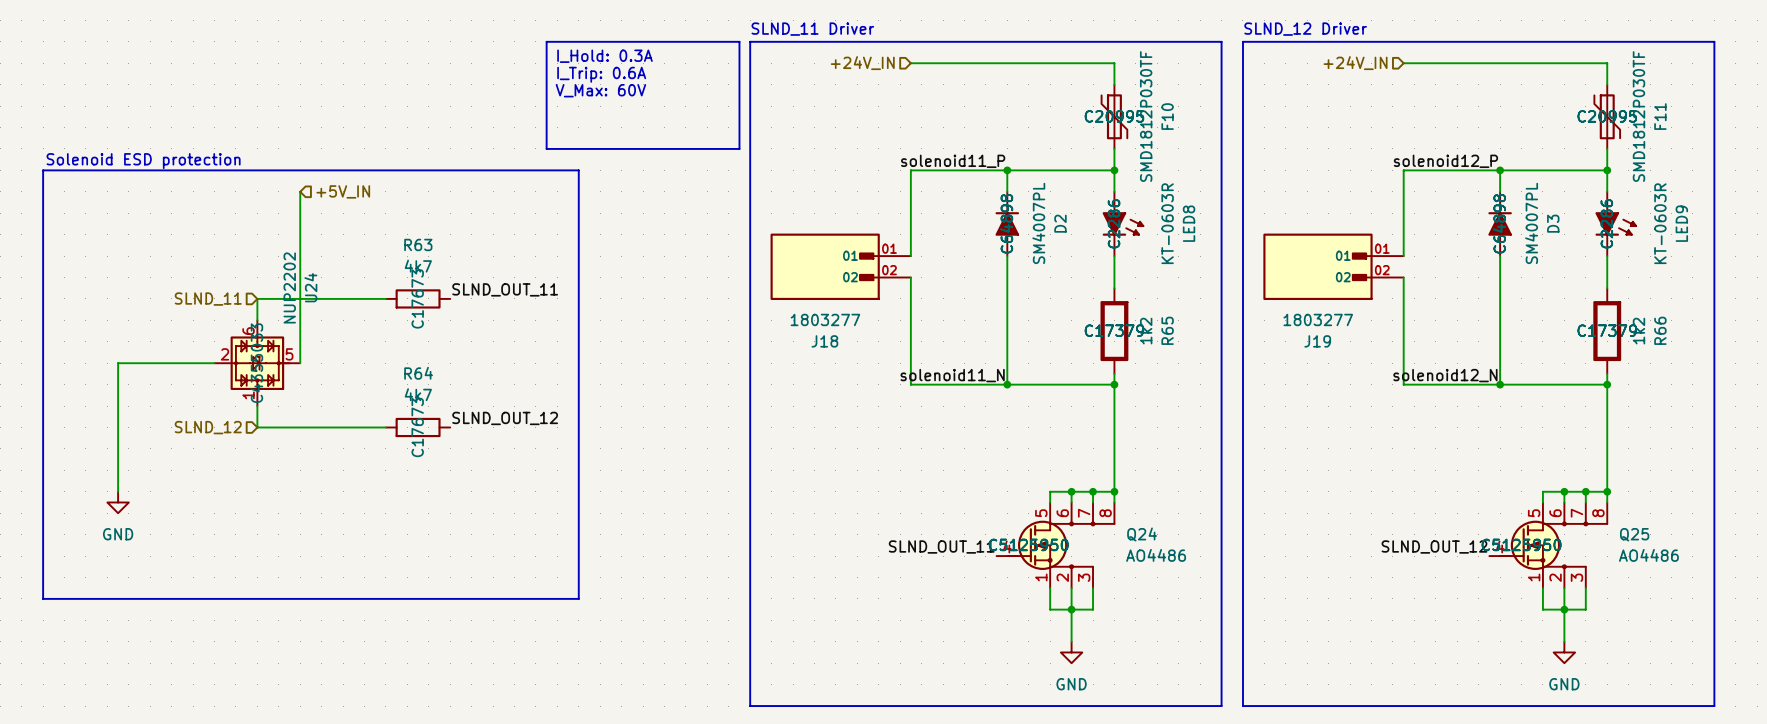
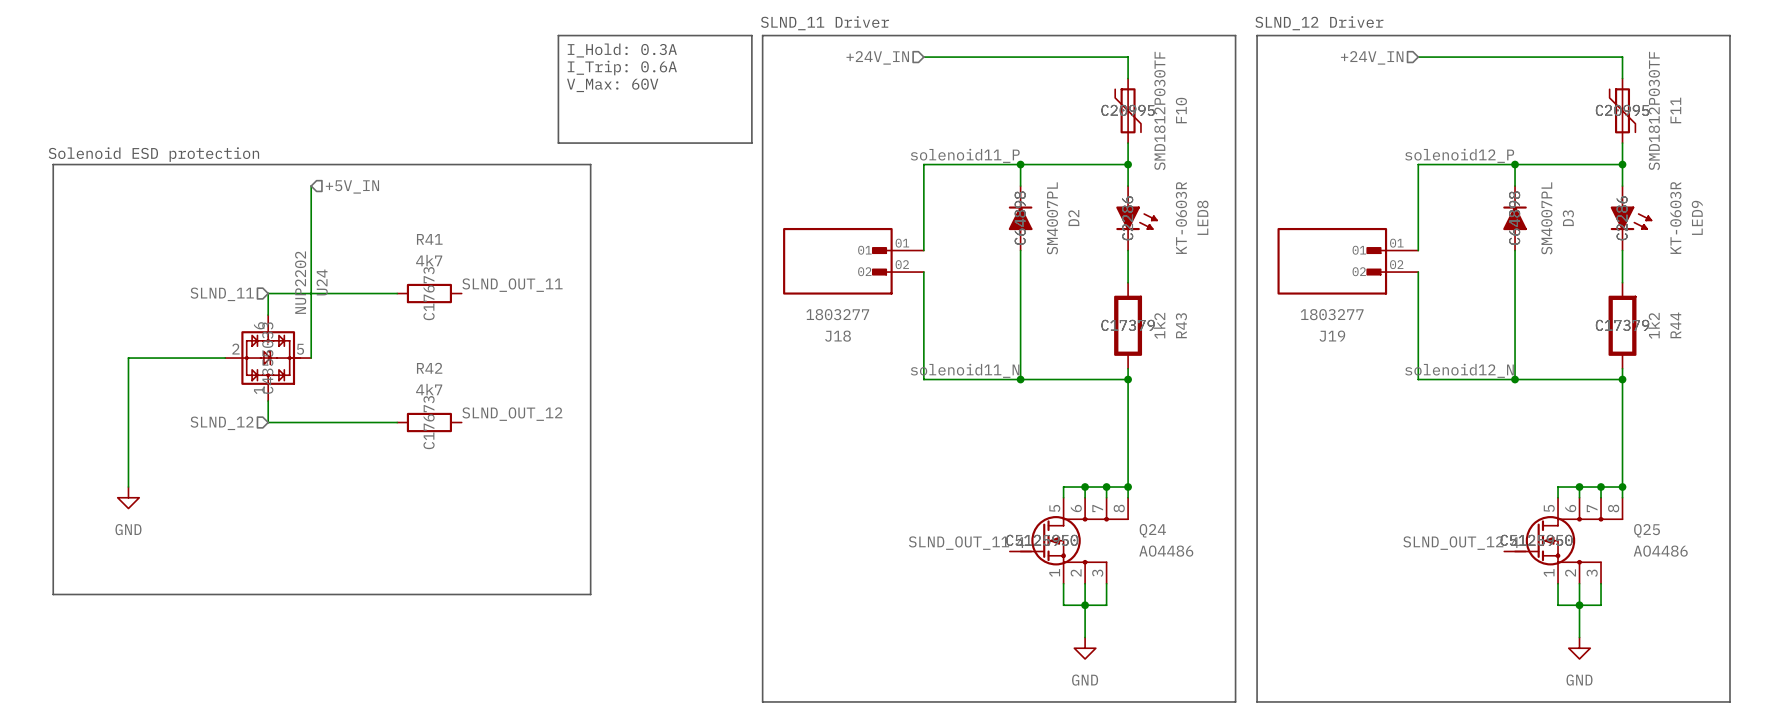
R63 name: R63 (418, 244) -> R41 (429, 239)
R65 name: R65 (1167, 330) -> R43 (1181, 325)
R66 name: R66 (1660, 330) -> R44 (1675, 325)
R64 name: R64 (418, 373) -> R42 (429, 368)

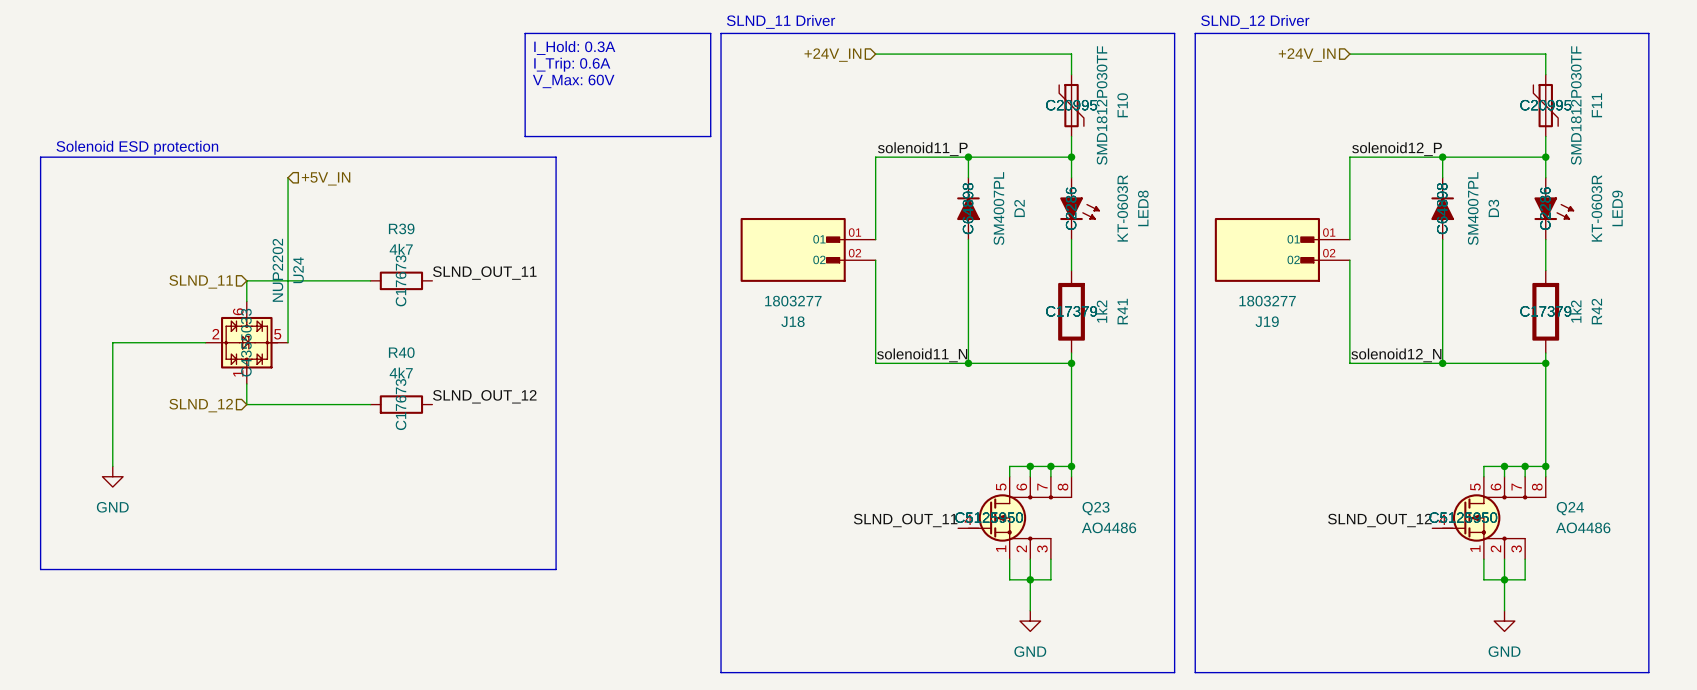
R41 name: R41 (429, 239) -> R39 (401, 228)
R43 name: R43 (1181, 325) -> R41 (1122, 311)
R44 name: R44 (1675, 325) -> R42 (1596, 311)
R42 name: R42 (429, 368) -> R40 (401, 352)
Q24 name: Q24 (1152, 530) -> Q23 (1096, 508)
Q25 name: Q25 (1647, 530) -> Q24 (1570, 508)

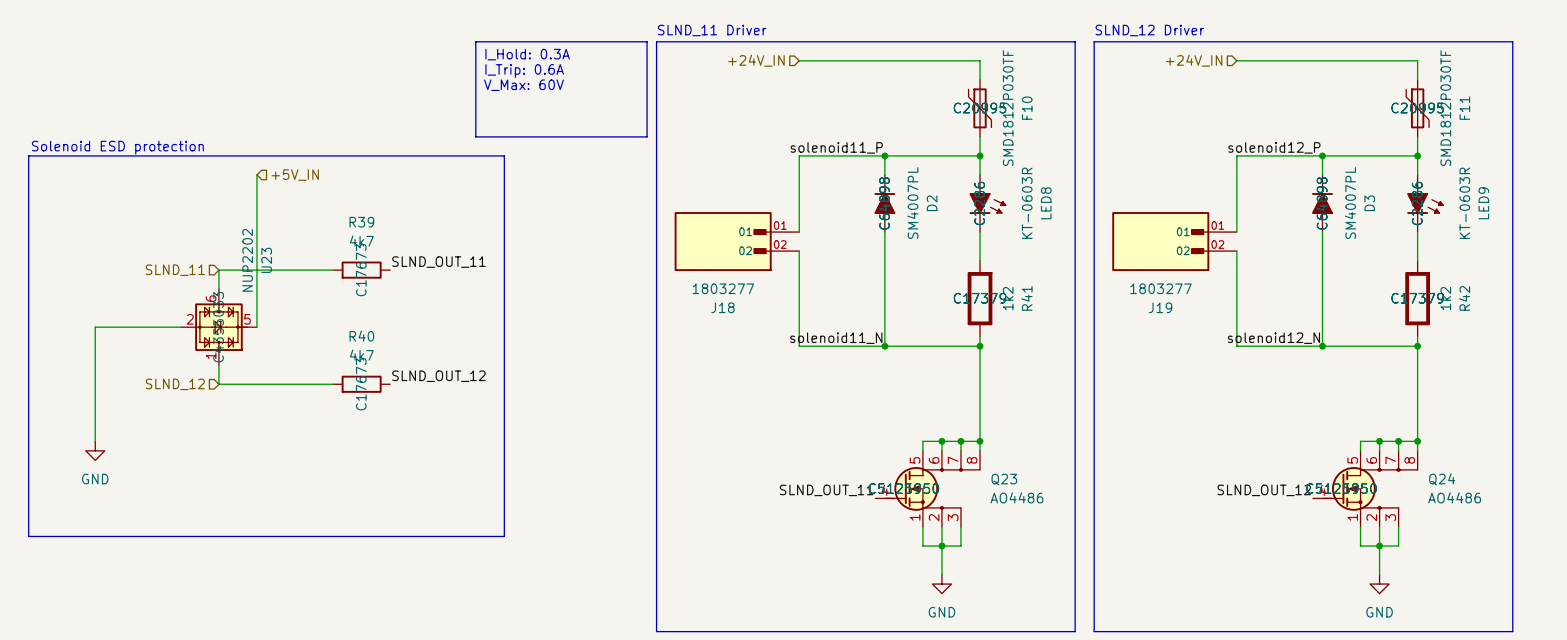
U24 name: U24 (298, 270) -> U23 (266, 260)

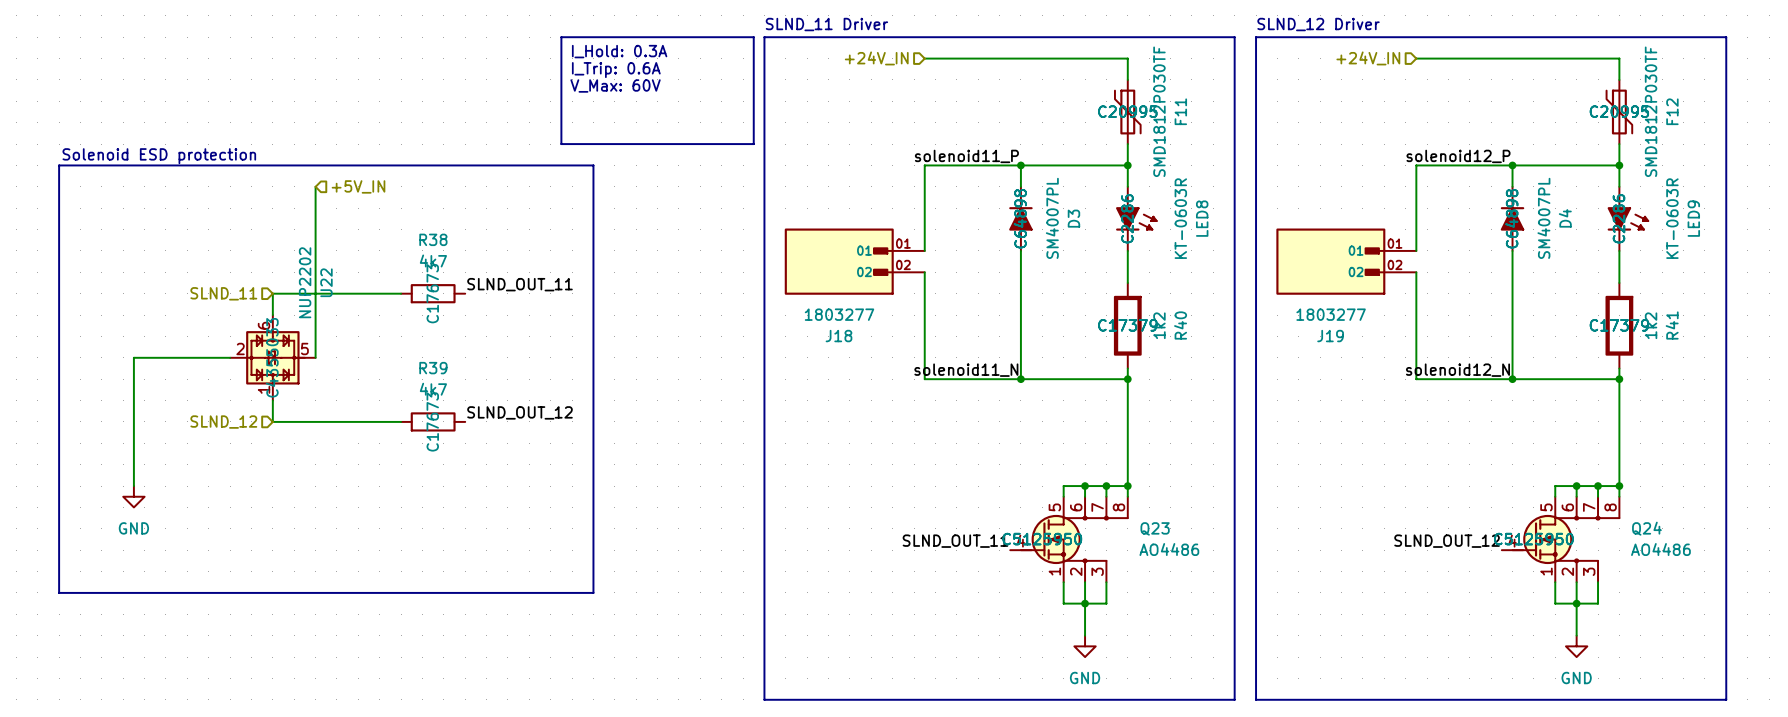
F10 name: F10 (1027, 108) -> F11 (1180, 111)
F11 name: F11 (1464, 108) -> F12 (1672, 111)
D2 name: D2 (932, 203) -> D3 (1073, 218)
D3 name: D3 (1369, 203) -> D4 (1565, 218)
R39 name: R39 (361, 222) -> R38 (433, 239)
U23 name: U23 (266, 260) -> U22 (326, 282)
R41 name: R41 (1026, 298) -> R40 (1180, 325)
R42 name: R42 (1464, 298) -> R41 (1672, 325)
R40 name: R40 (361, 336) -> R39 (433, 368)

